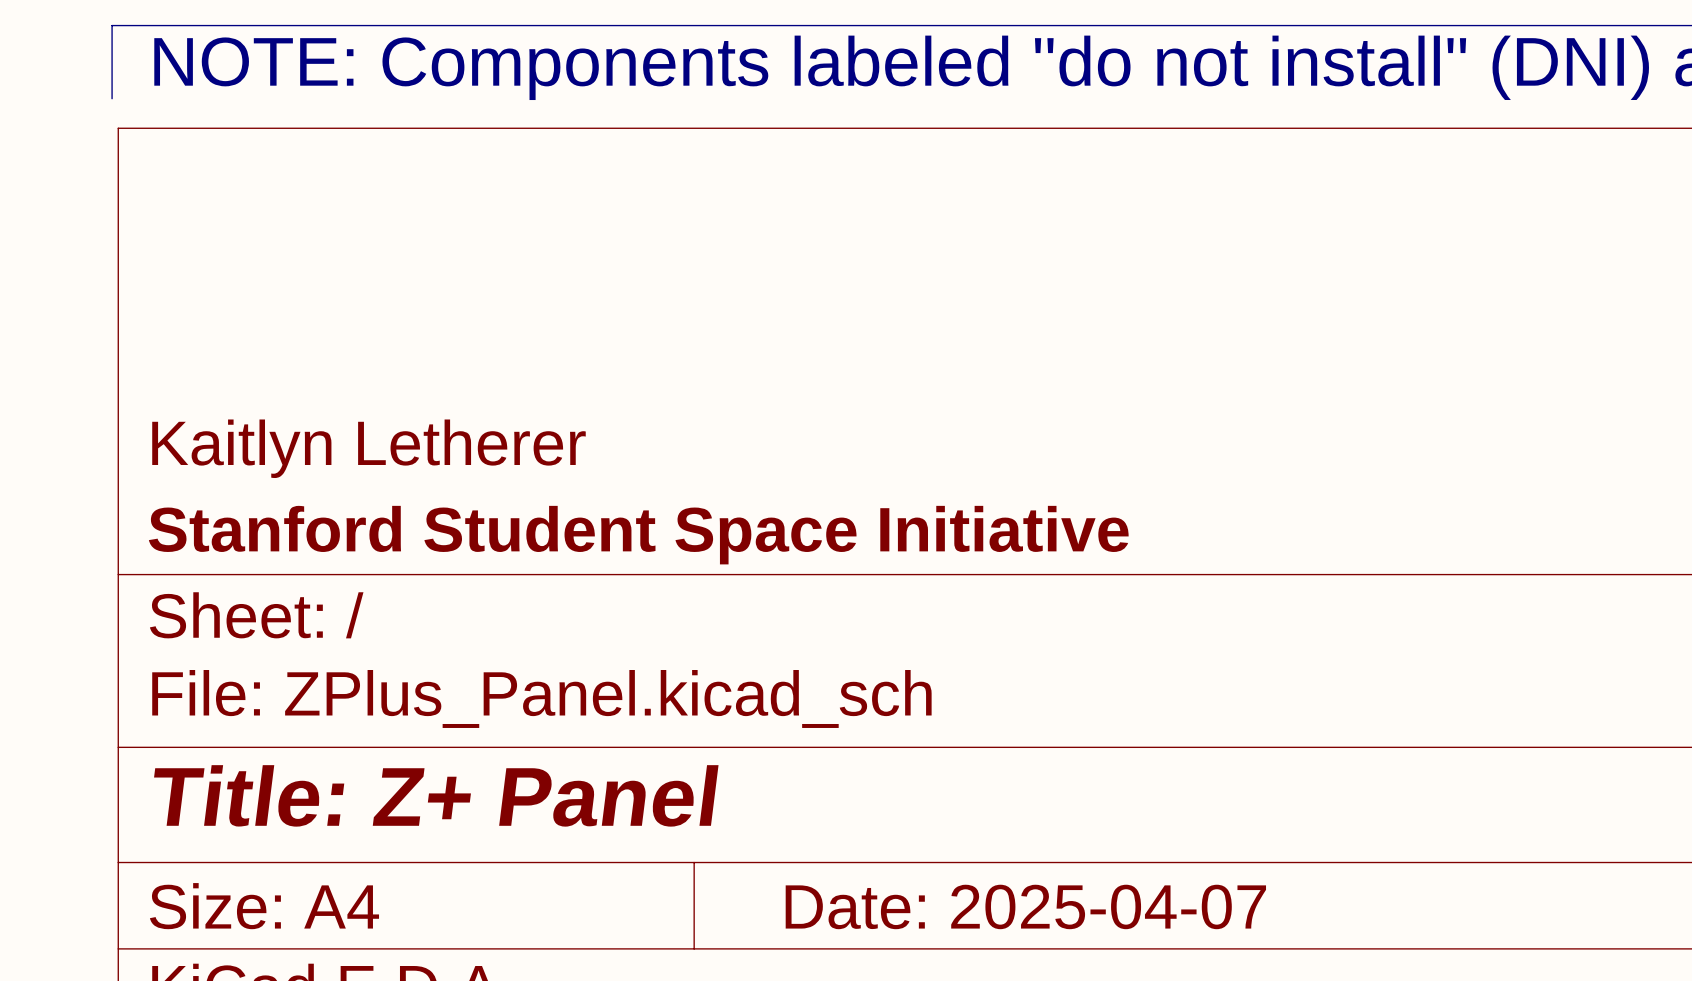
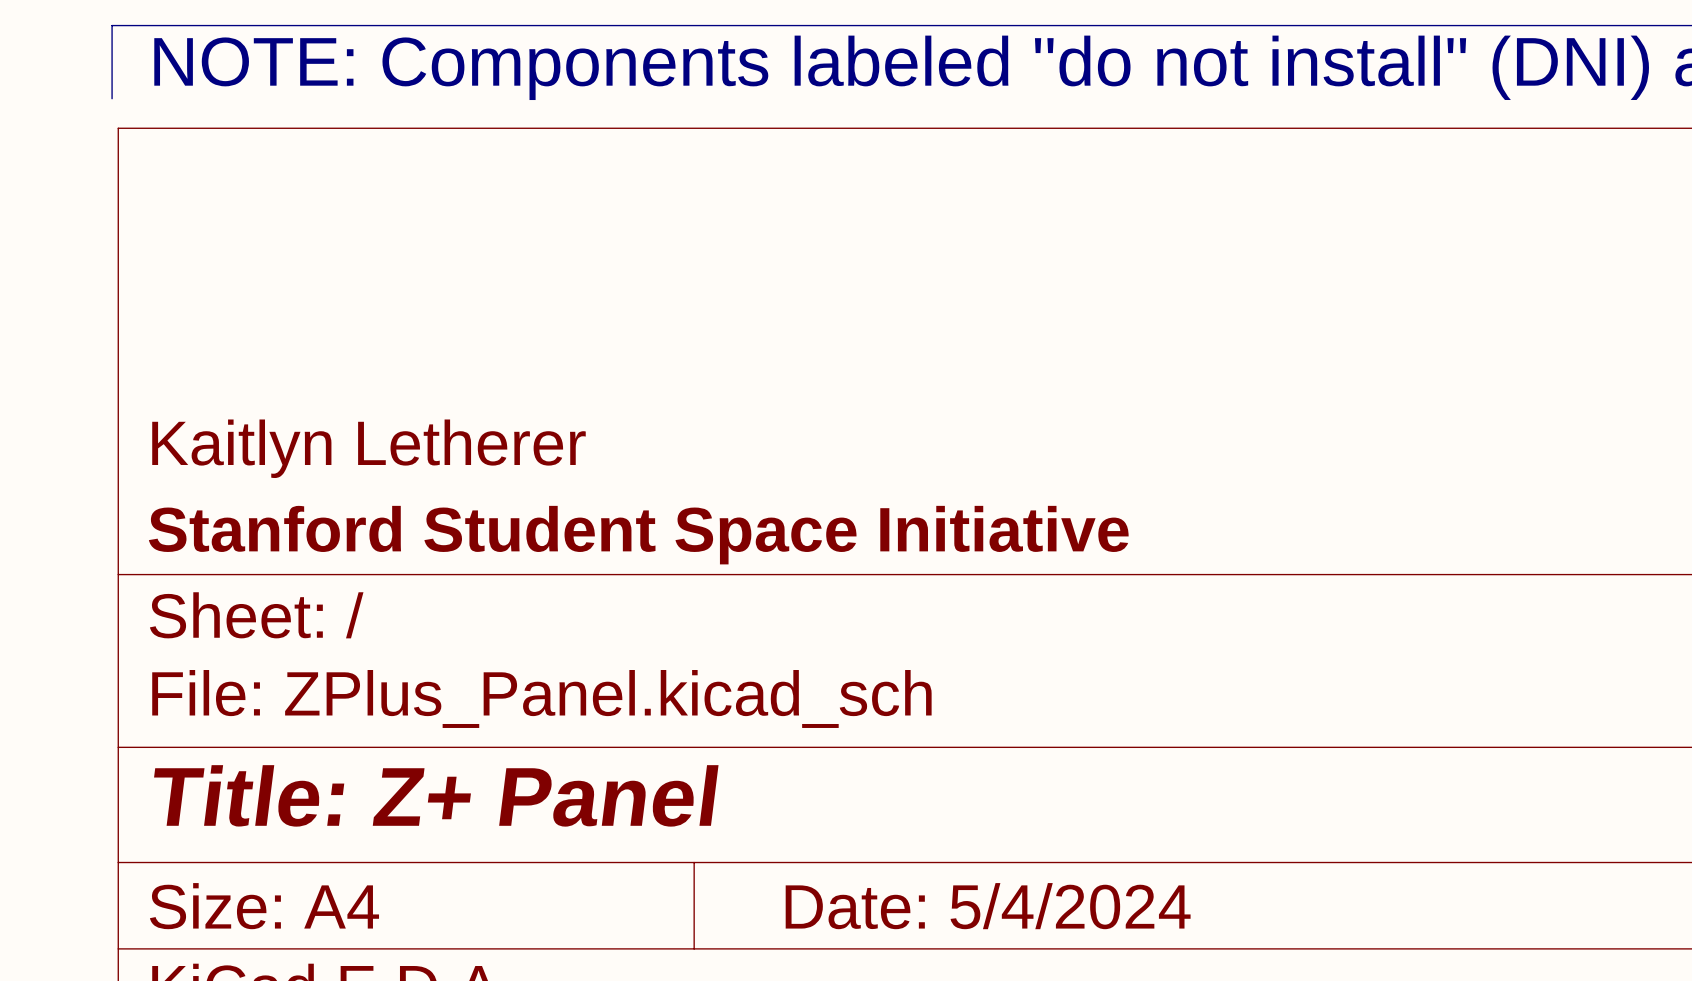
title block: Date: 2025-04-07 (1025, 906) -> Date: 5/4/2024 (988, 906)

